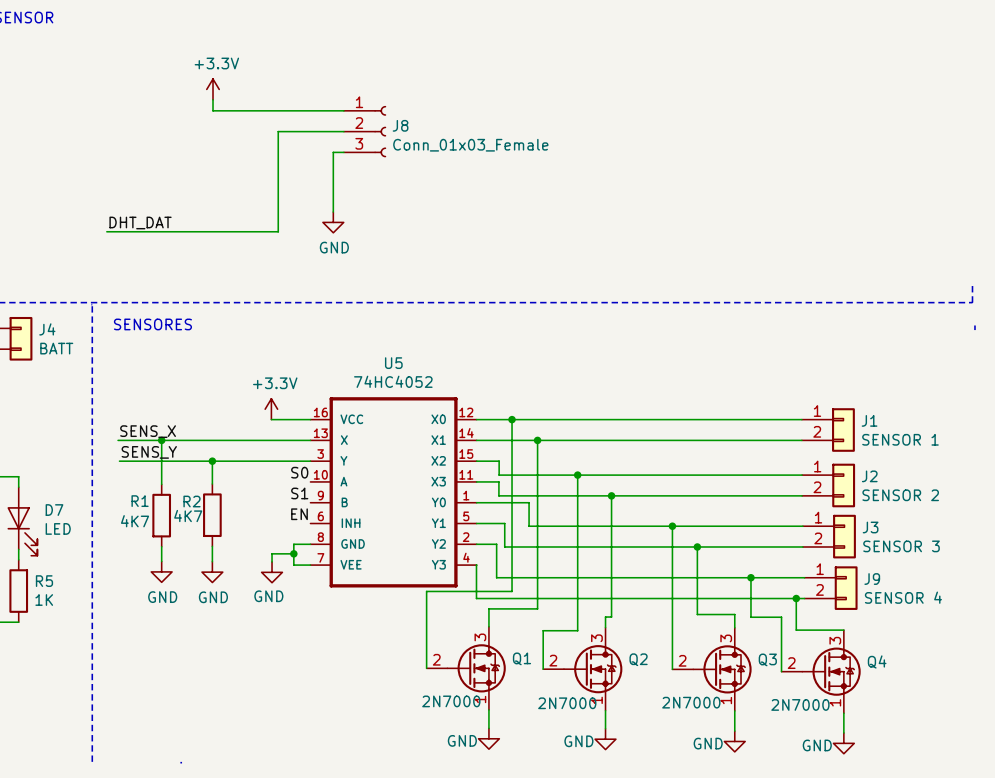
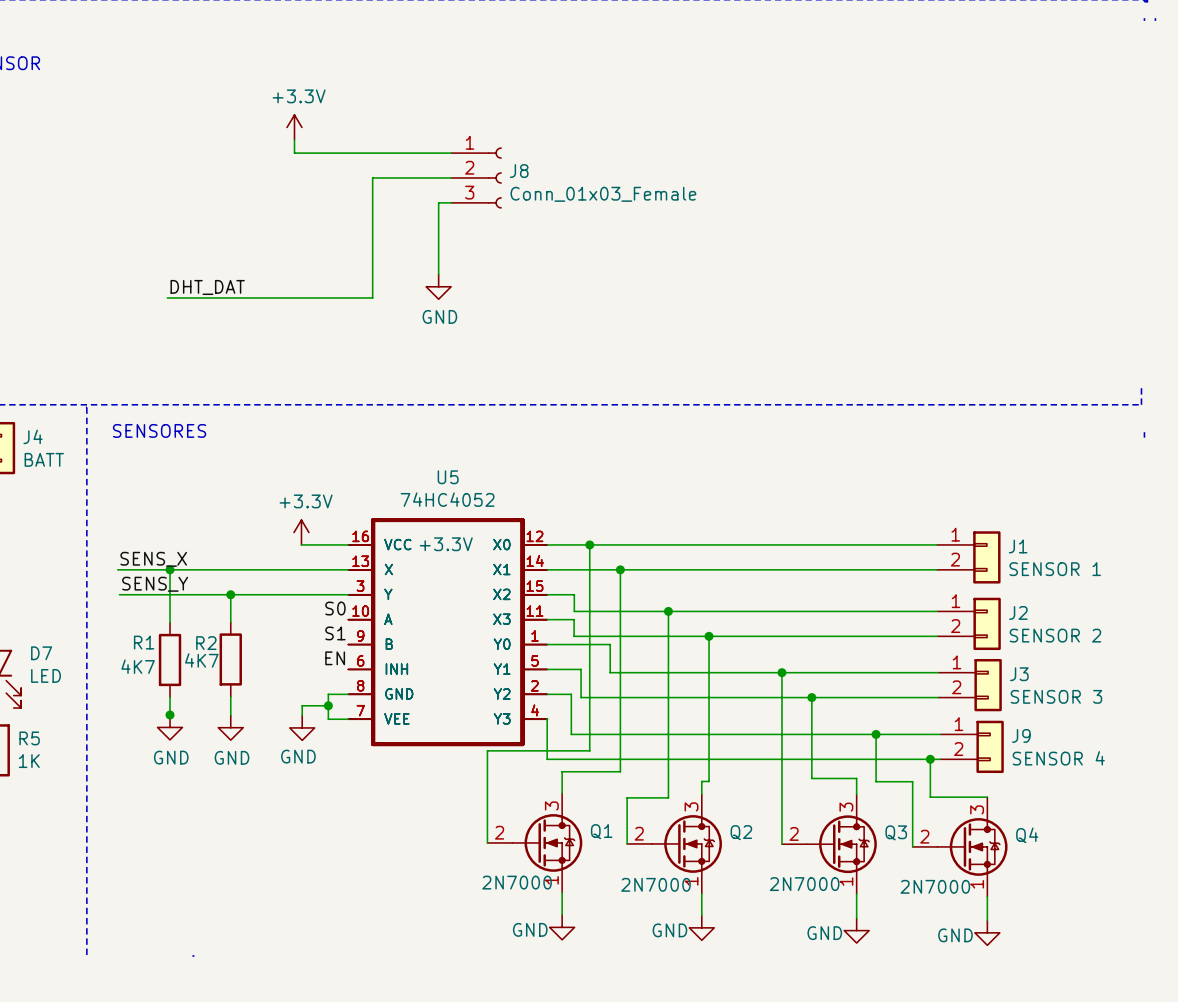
power symbol position: +3.3V (213, 89) -> +3.3V (294, 127)
wire: (213, 99) (213, 110) (343, 110) -> (294, 139) (294, 153) (451, 153)
wire: (343, 131) (278, 131) (278, 231) (106, 231) -> (451, 177) (372, 177) (372, 297) (167, 297)
J8 position: (365, 131) -> (476, 177)
wire: (343, 152) (333, 152) (333, 212) -> (451, 202) (438, 202) (438, 274)
label position: DHT_DAT (140, 222) -> DHT_DAT (207, 287)
power symbol position: GND (333, 222) -> GND (438, 286)
power symbol: none -> +3.3V (447, 632)
junction: none -> (170, 715)

